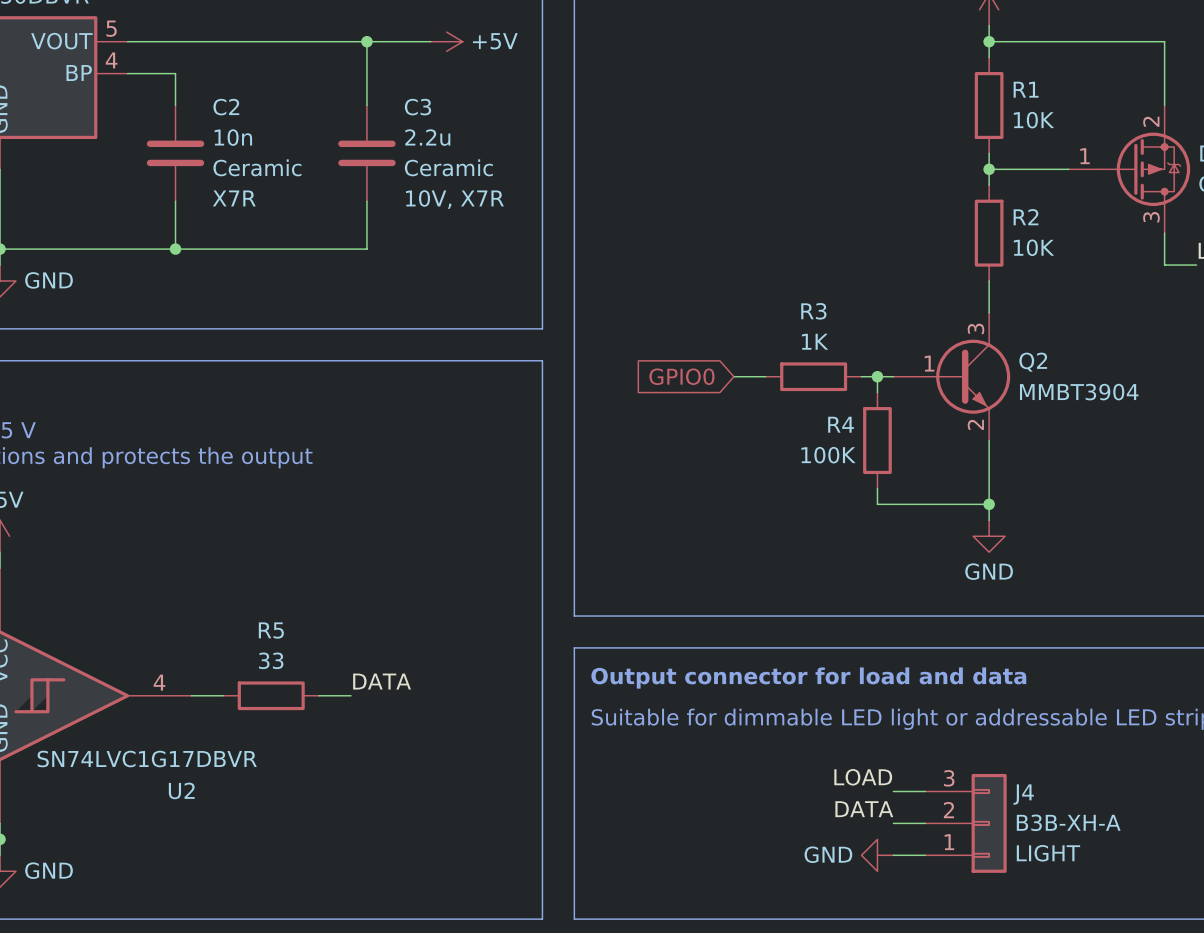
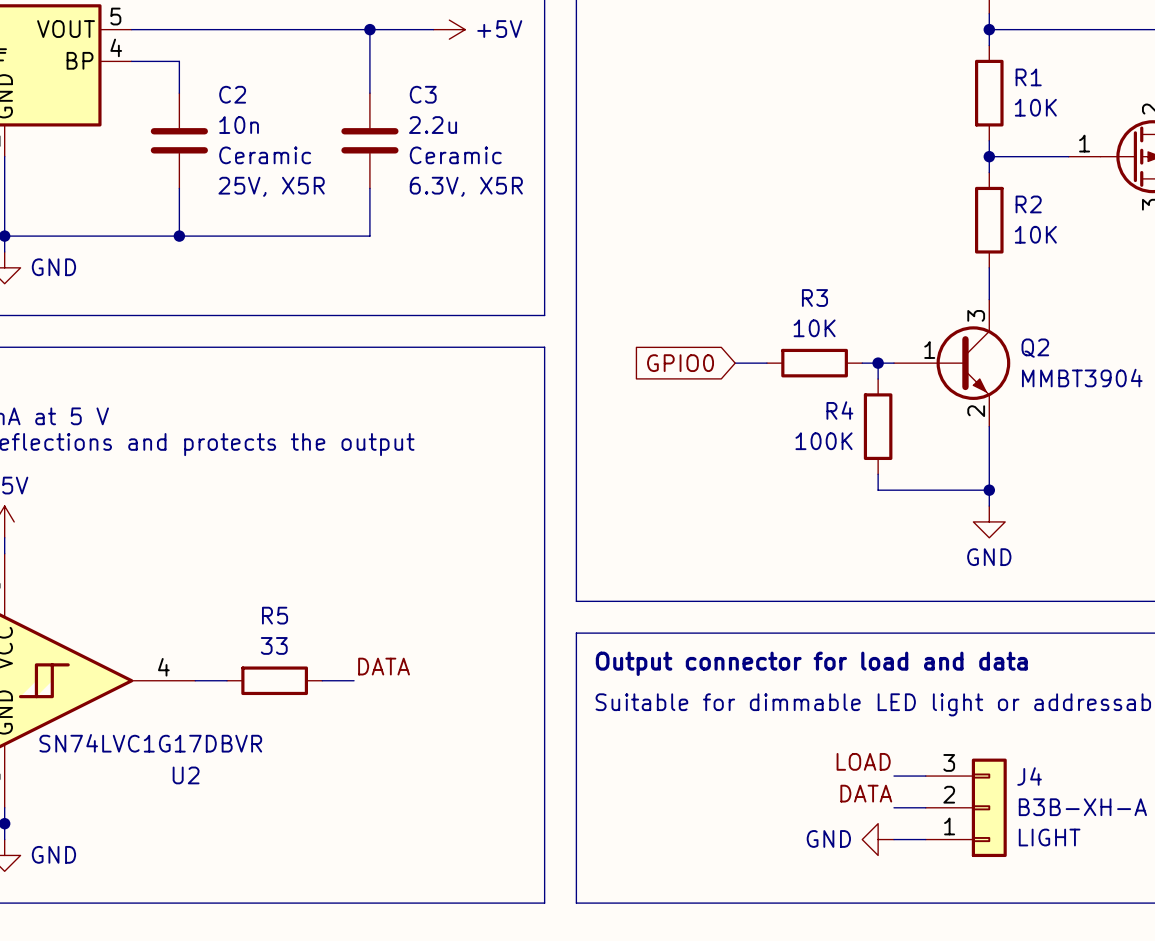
C2 text: X7R (234, 198) -> 25V, X5R (271, 186)
C3 text: 10V, X7R (454, 199) -> 6.3V, X5R (466, 186)
R3 value: 1K (815, 341) -> 10K (814, 328)

